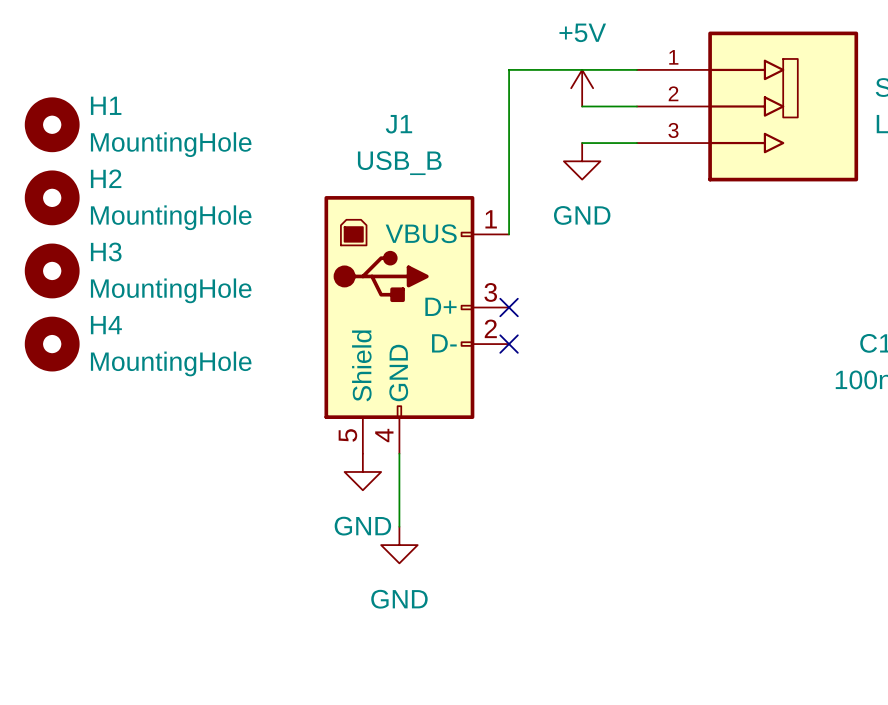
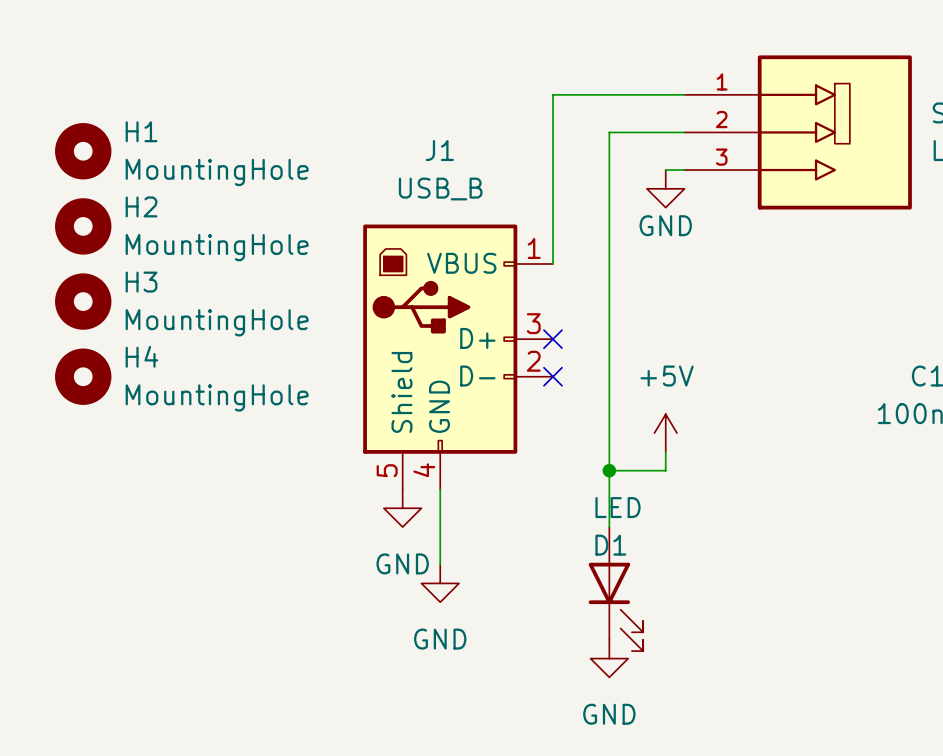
power symbol position: +5V (582, 88) -> +5V (665, 433)
wire: none -> (628, 132) (609, 132) (609, 527)
wire: (582, 143) (618, 143) -> none
power symbol position: GND (582, 161) -> GND (665, 188)
power symbol text position: GND (582, 215) -> GND (665, 225)
wire: none -> (665, 451) (665, 470) (609, 470)
junction: none -> (609, 470)
D1: none -> LED (615, 589)
power symbol: none -> GND (609, 658)

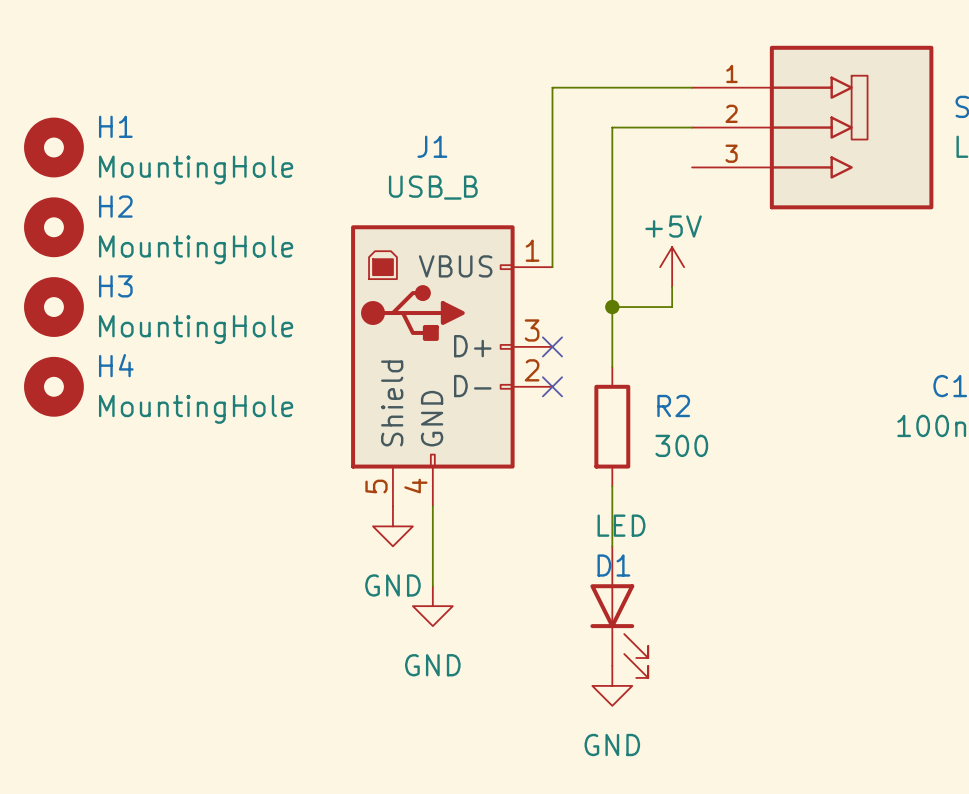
wire: (665, 170) (684, 170) -> none
power symbol: GND (665, 188) -> none
wire: none -> (672, 287) (672, 307) (612, 307)
junction: none -> (612, 307)
wire: (609, 357) (609, 470) (665, 470) (665, 451) -> none
power symbol text position: +5V (667, 376) -> +5V (673, 226)
R2: none -> 300 (612, 426)
power symbol position: +5V (665, 433) -> +5V (672, 267)
junction: (609, 470) -> none

